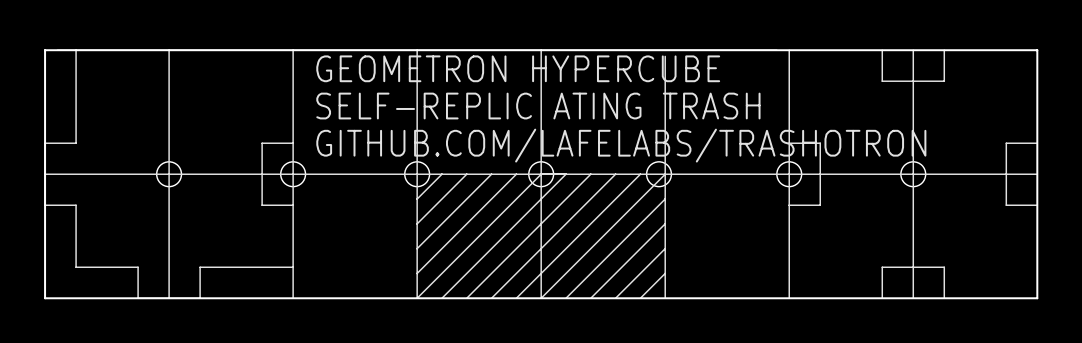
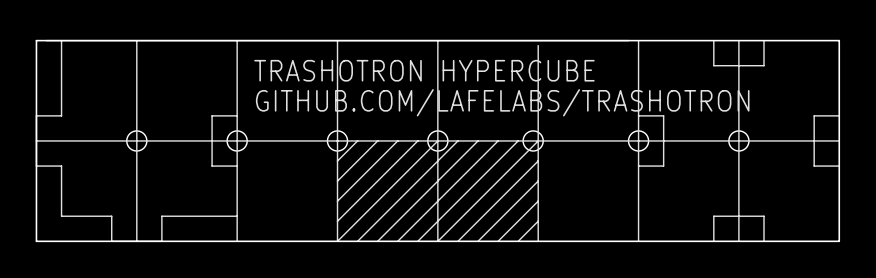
text: GEOMETRON HYPERCUBE (518, 68) -> TRASHOTRON HYPERCUBE (424, 70)
text: SELF-REPLIC ATING TRASH (538, 106) -> none
text position: GITHUB.COM/LAFELABS/TRASHOTRON (621, 145) -> GITHUB.COM/LAFELABS/TRASHOTRON (502, 102)

